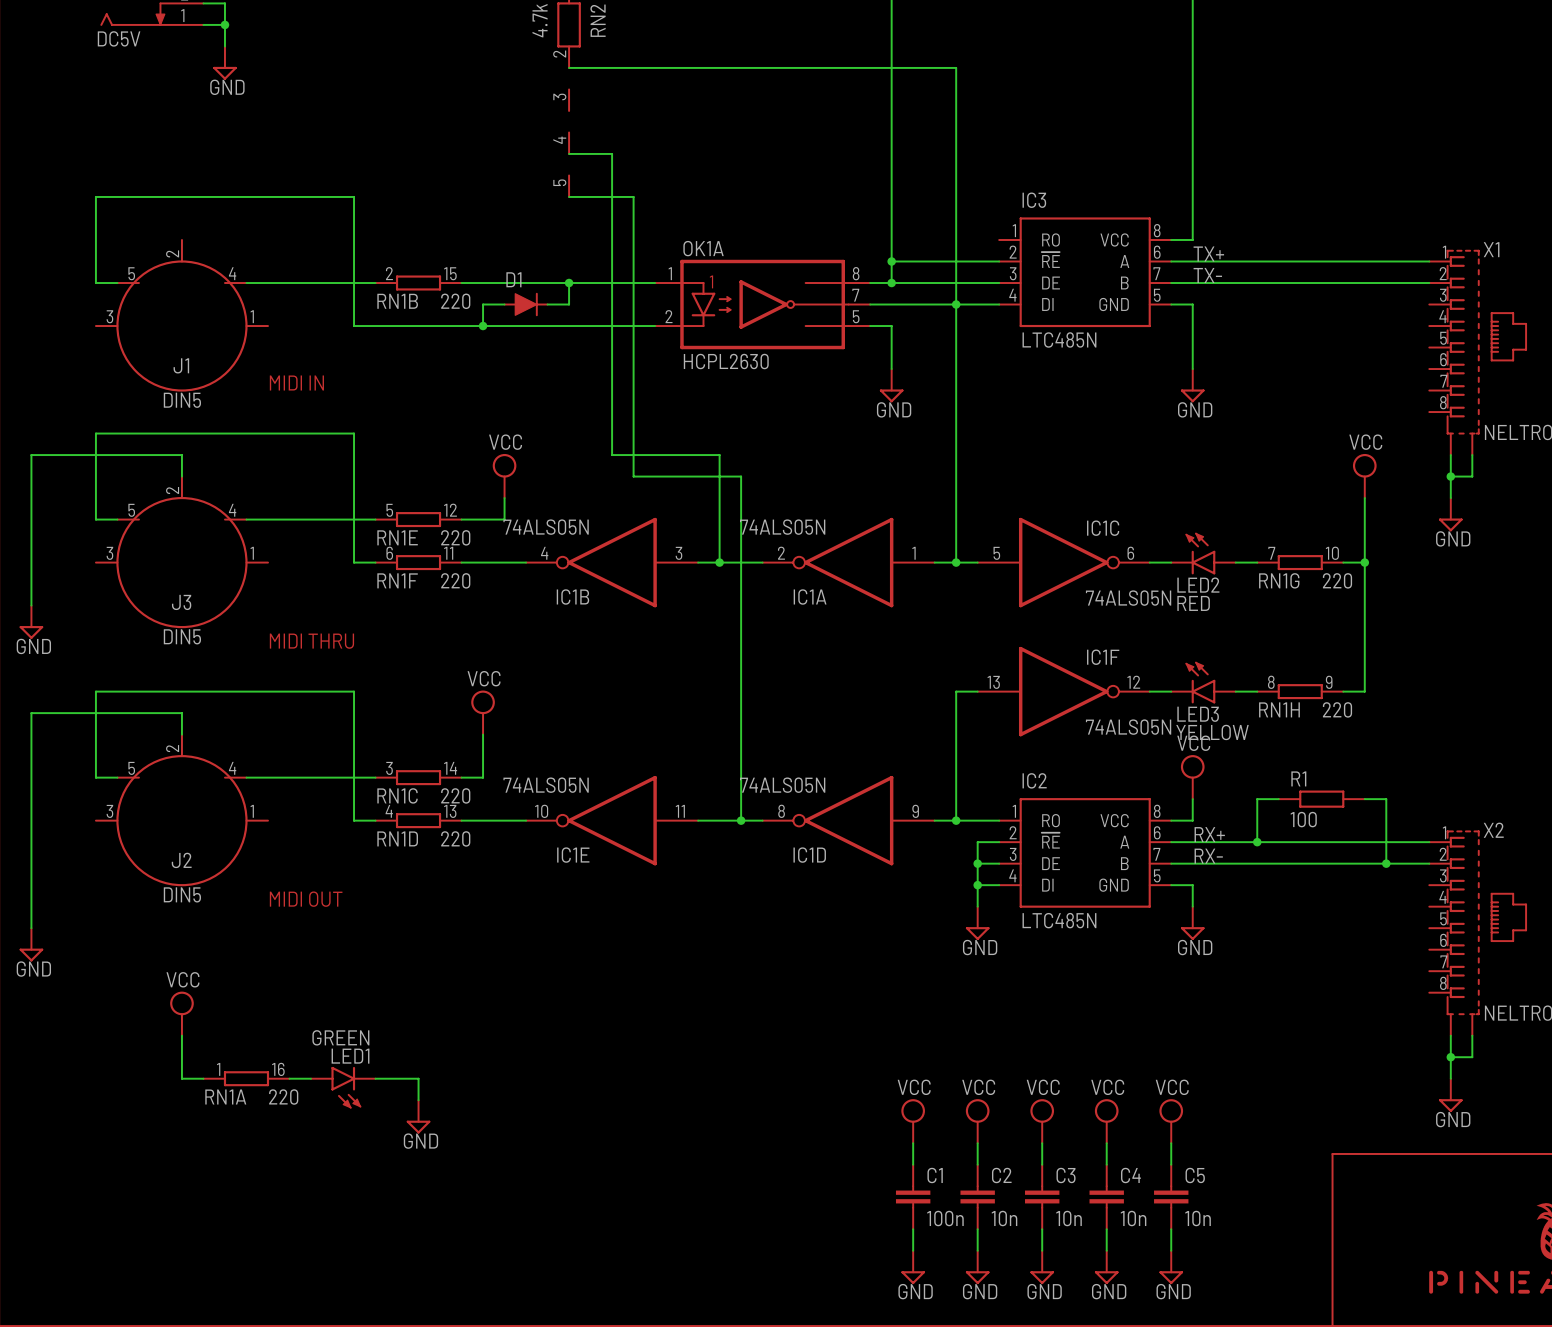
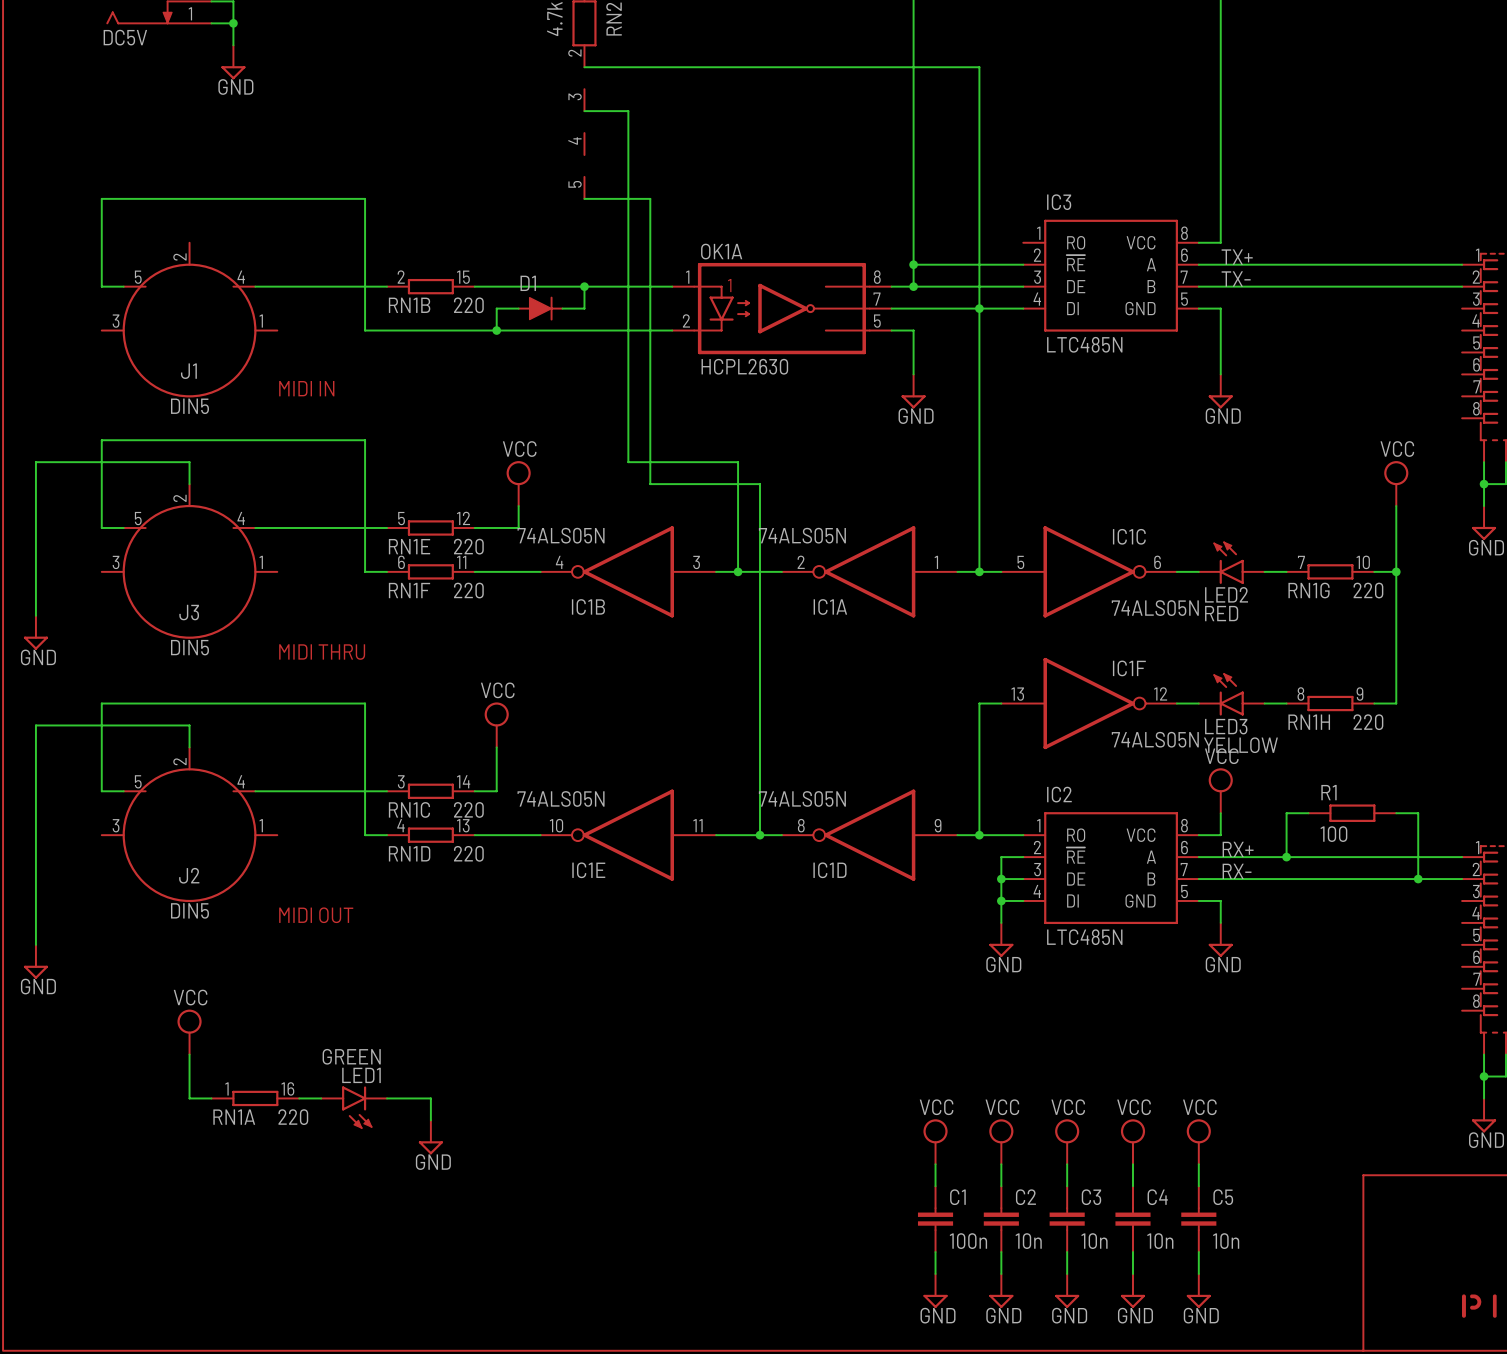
wire: (569, 153) (612, 153) -> (584, 111) (628, 111) (628, 155)

